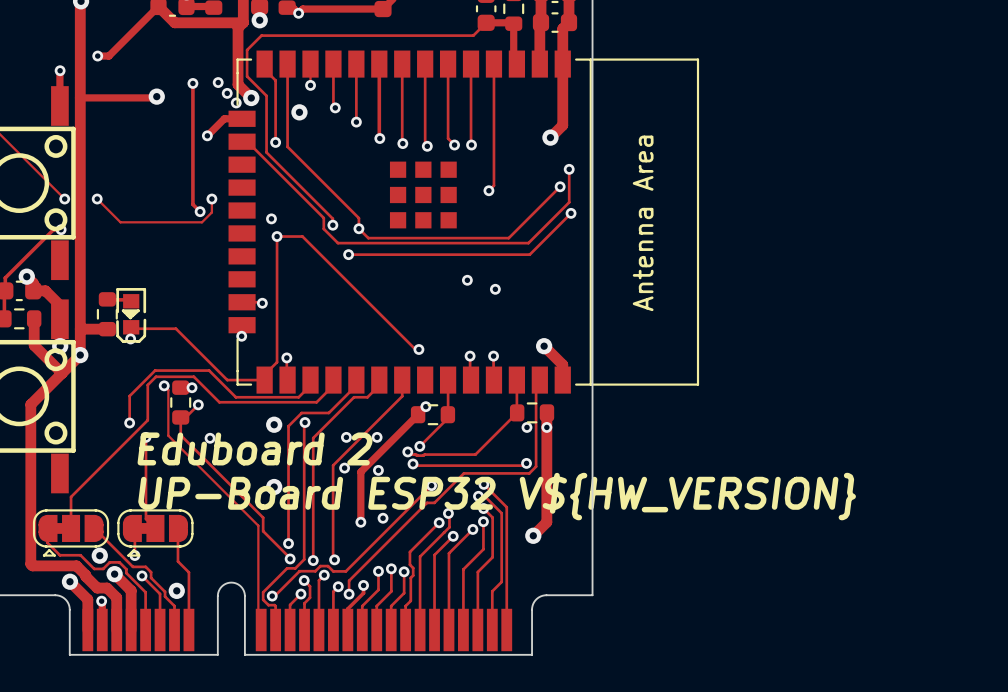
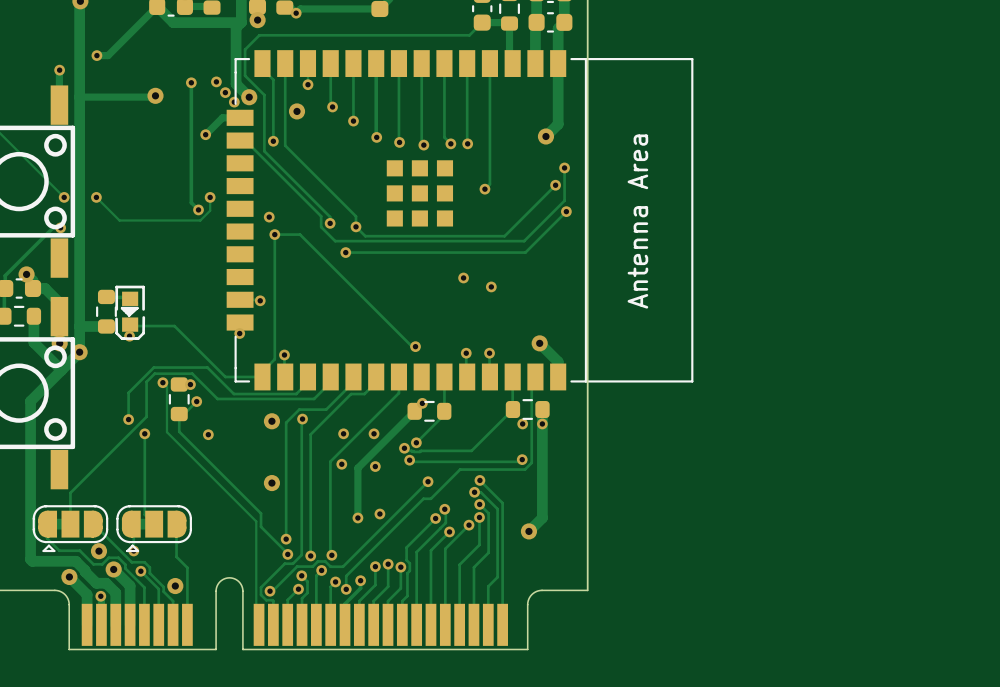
text: Eduboard 2 (255, 448) -> none
text: UP-Board ESP32 V${HW_VERSION} (497, 496) -> none

